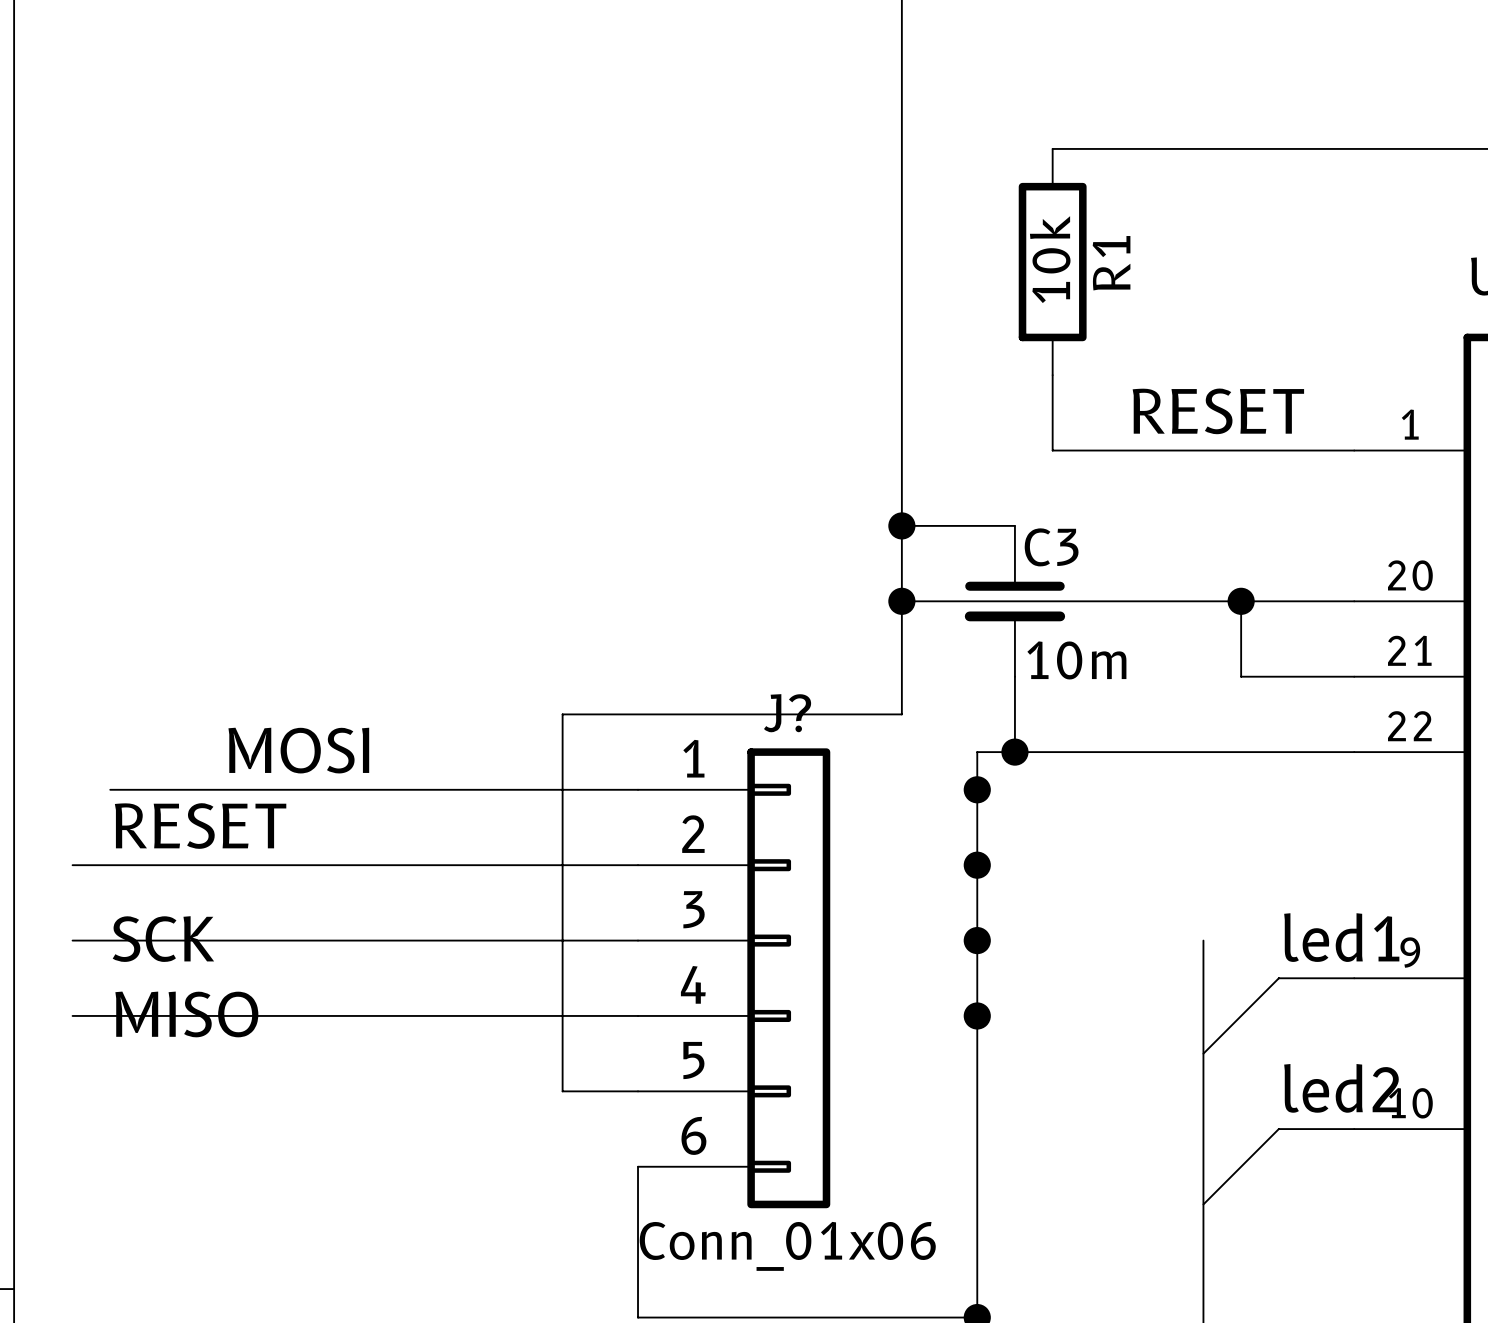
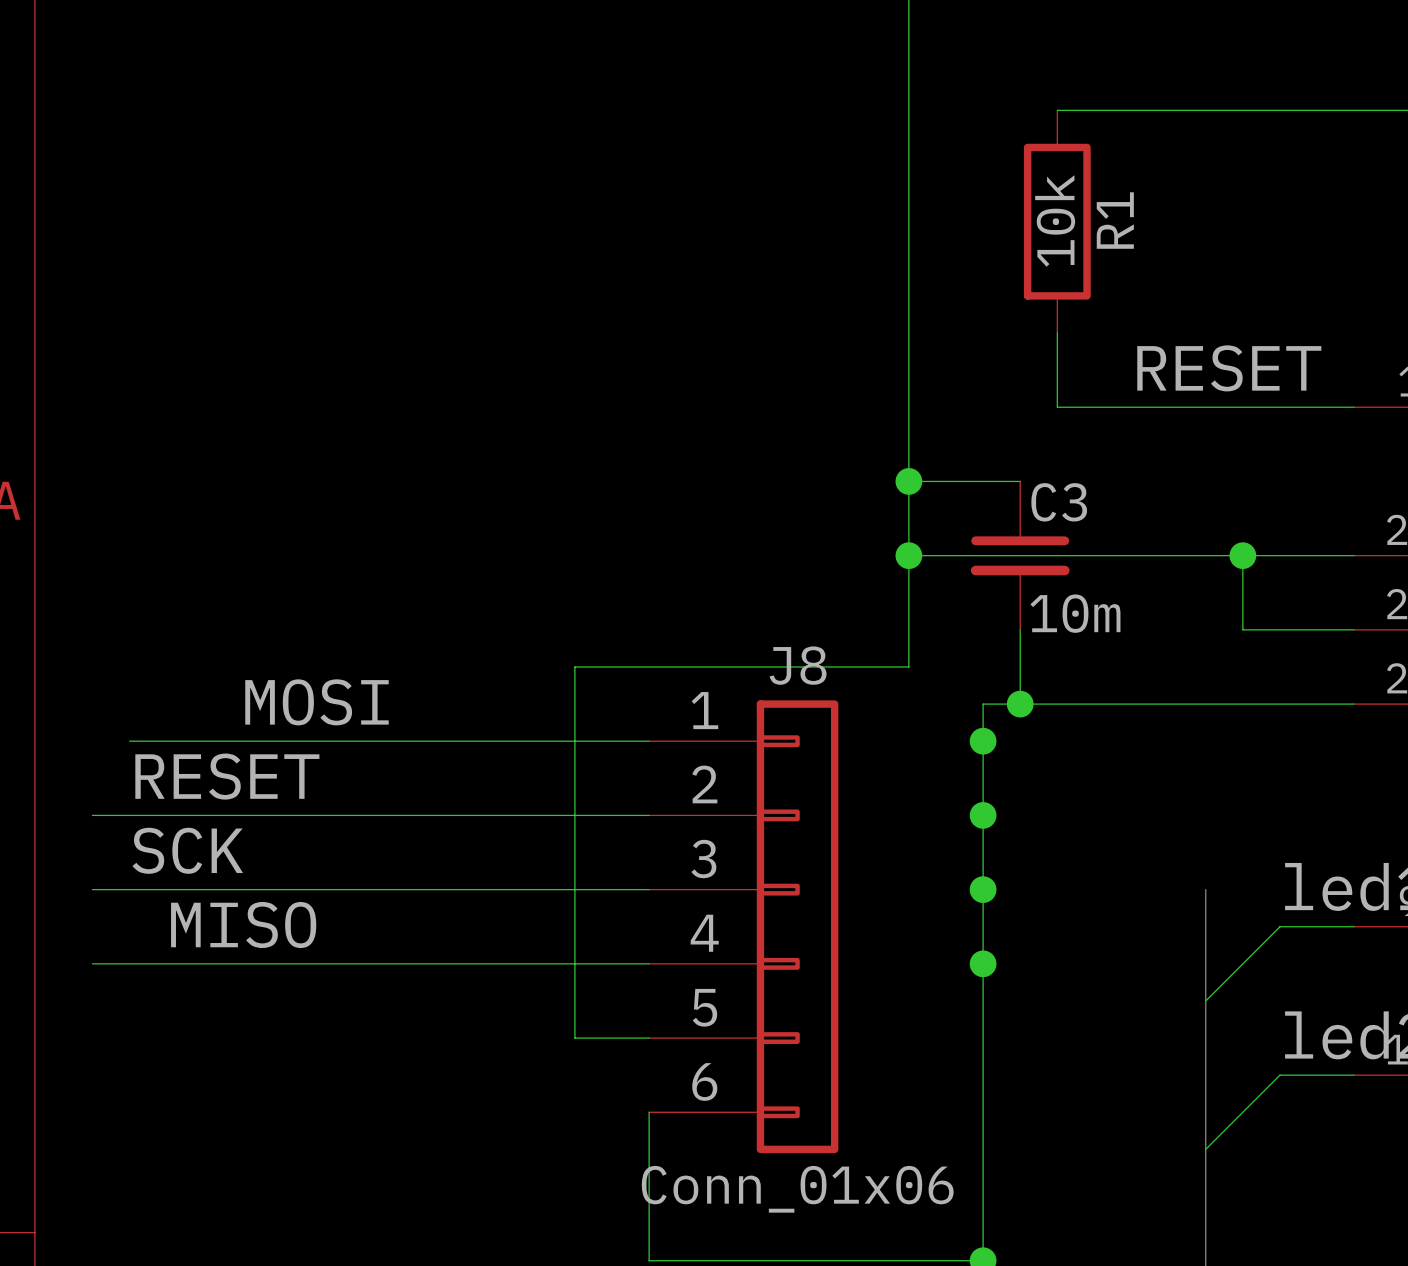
J? name: J? (787, 713) -> J8 (798, 665)
label position: SCK (163, 939) -> SCK (187, 850)
label position: MISO (186, 1014) -> MISO (243, 925)

